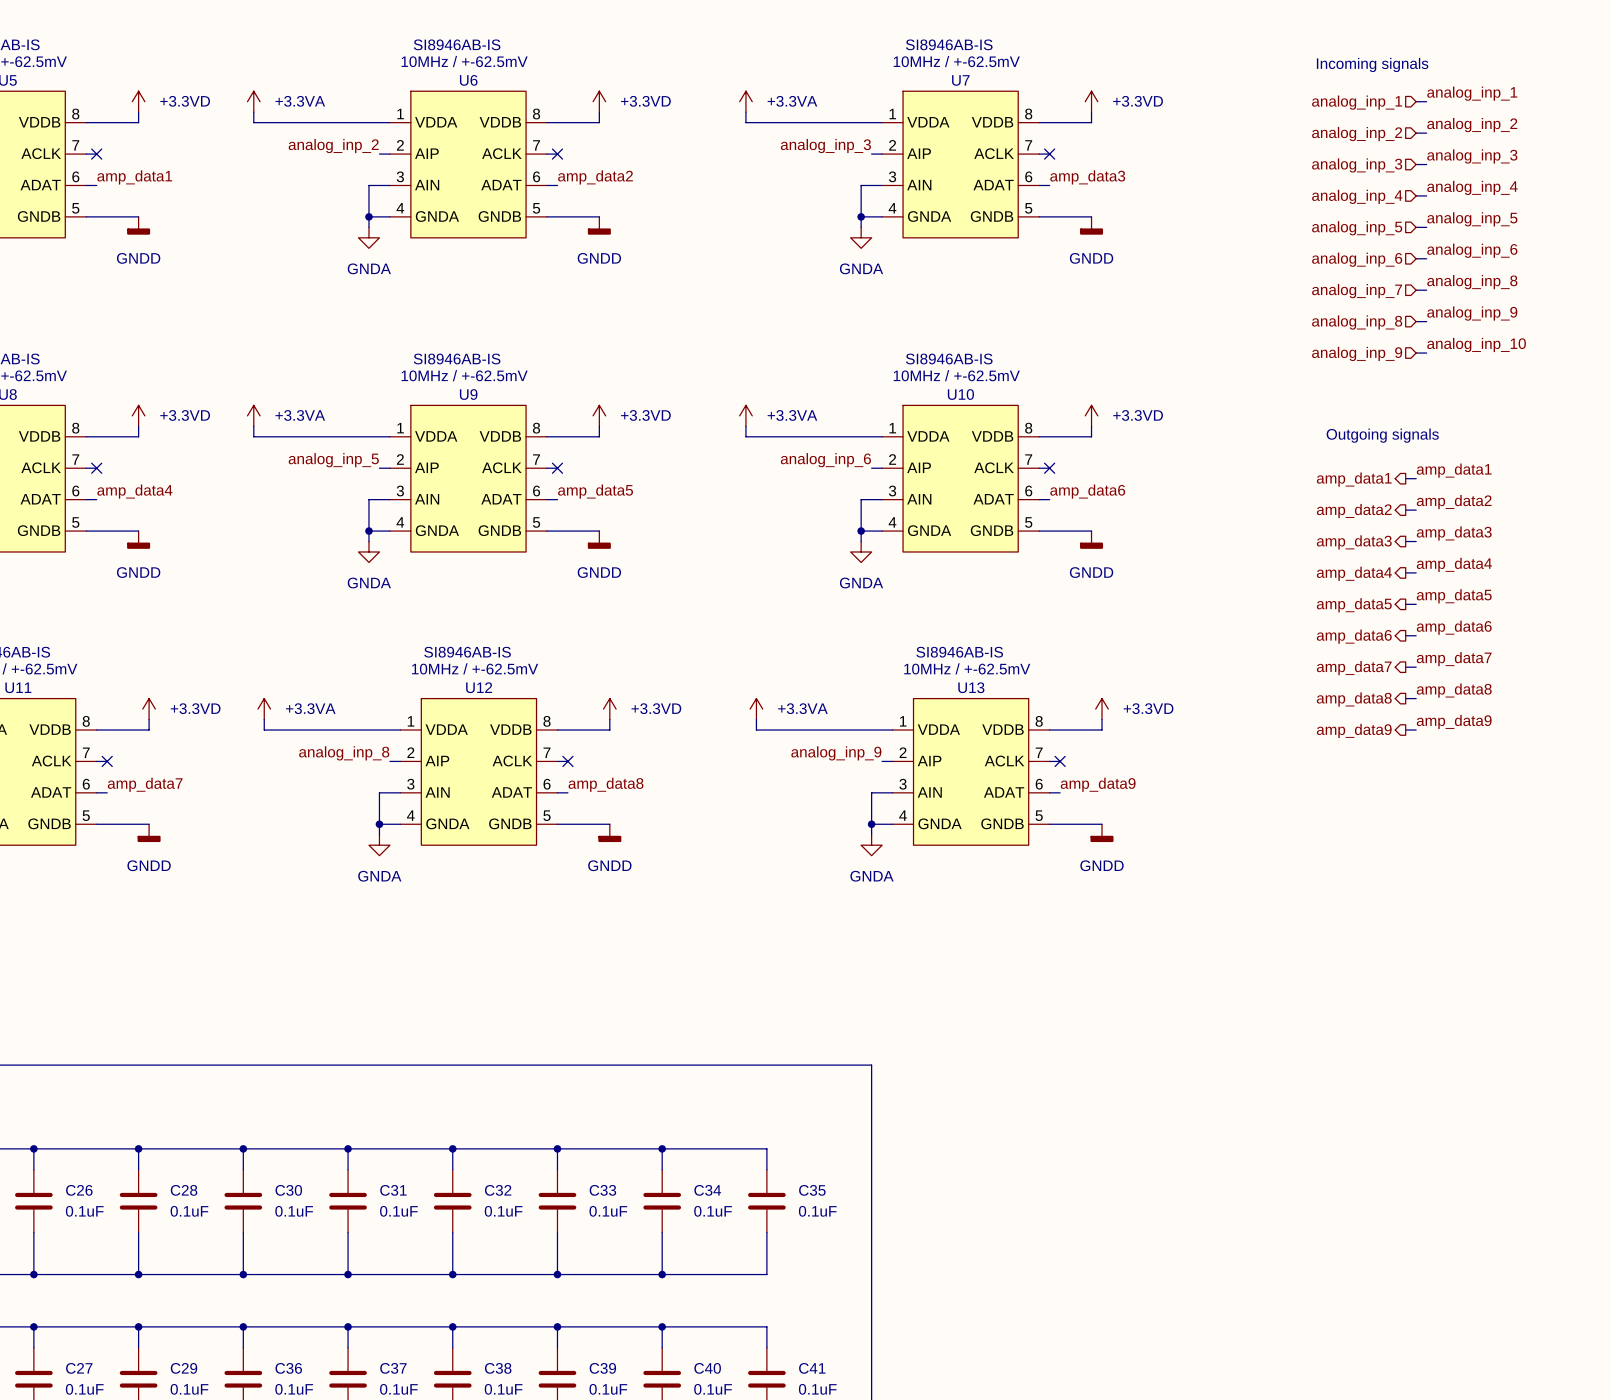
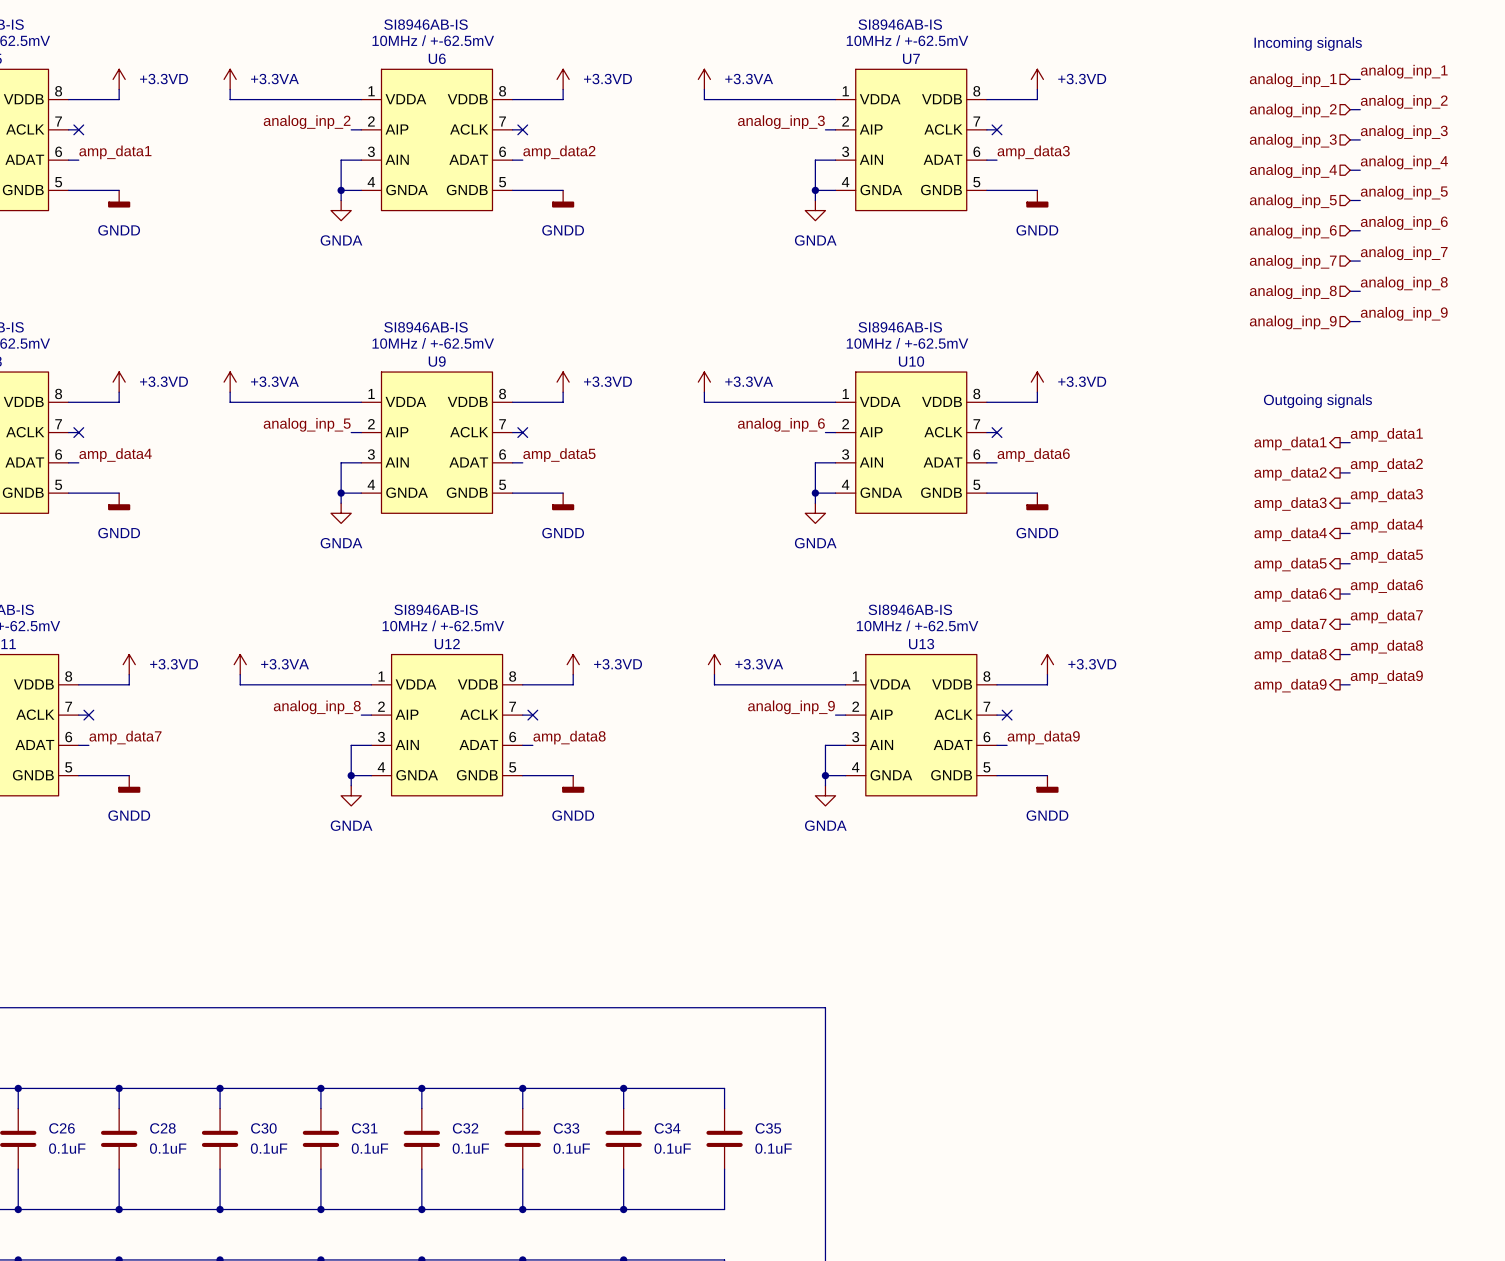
label: analog_inp_8 (1472, 282) -> analog_inp_7 (1404, 253)
label: analog_inp_9 (1472, 313) -> analog_inp_8 (1404, 283)
label: analog_inp_10 (1476, 344) -> analog_inp_9 (1404, 313)

